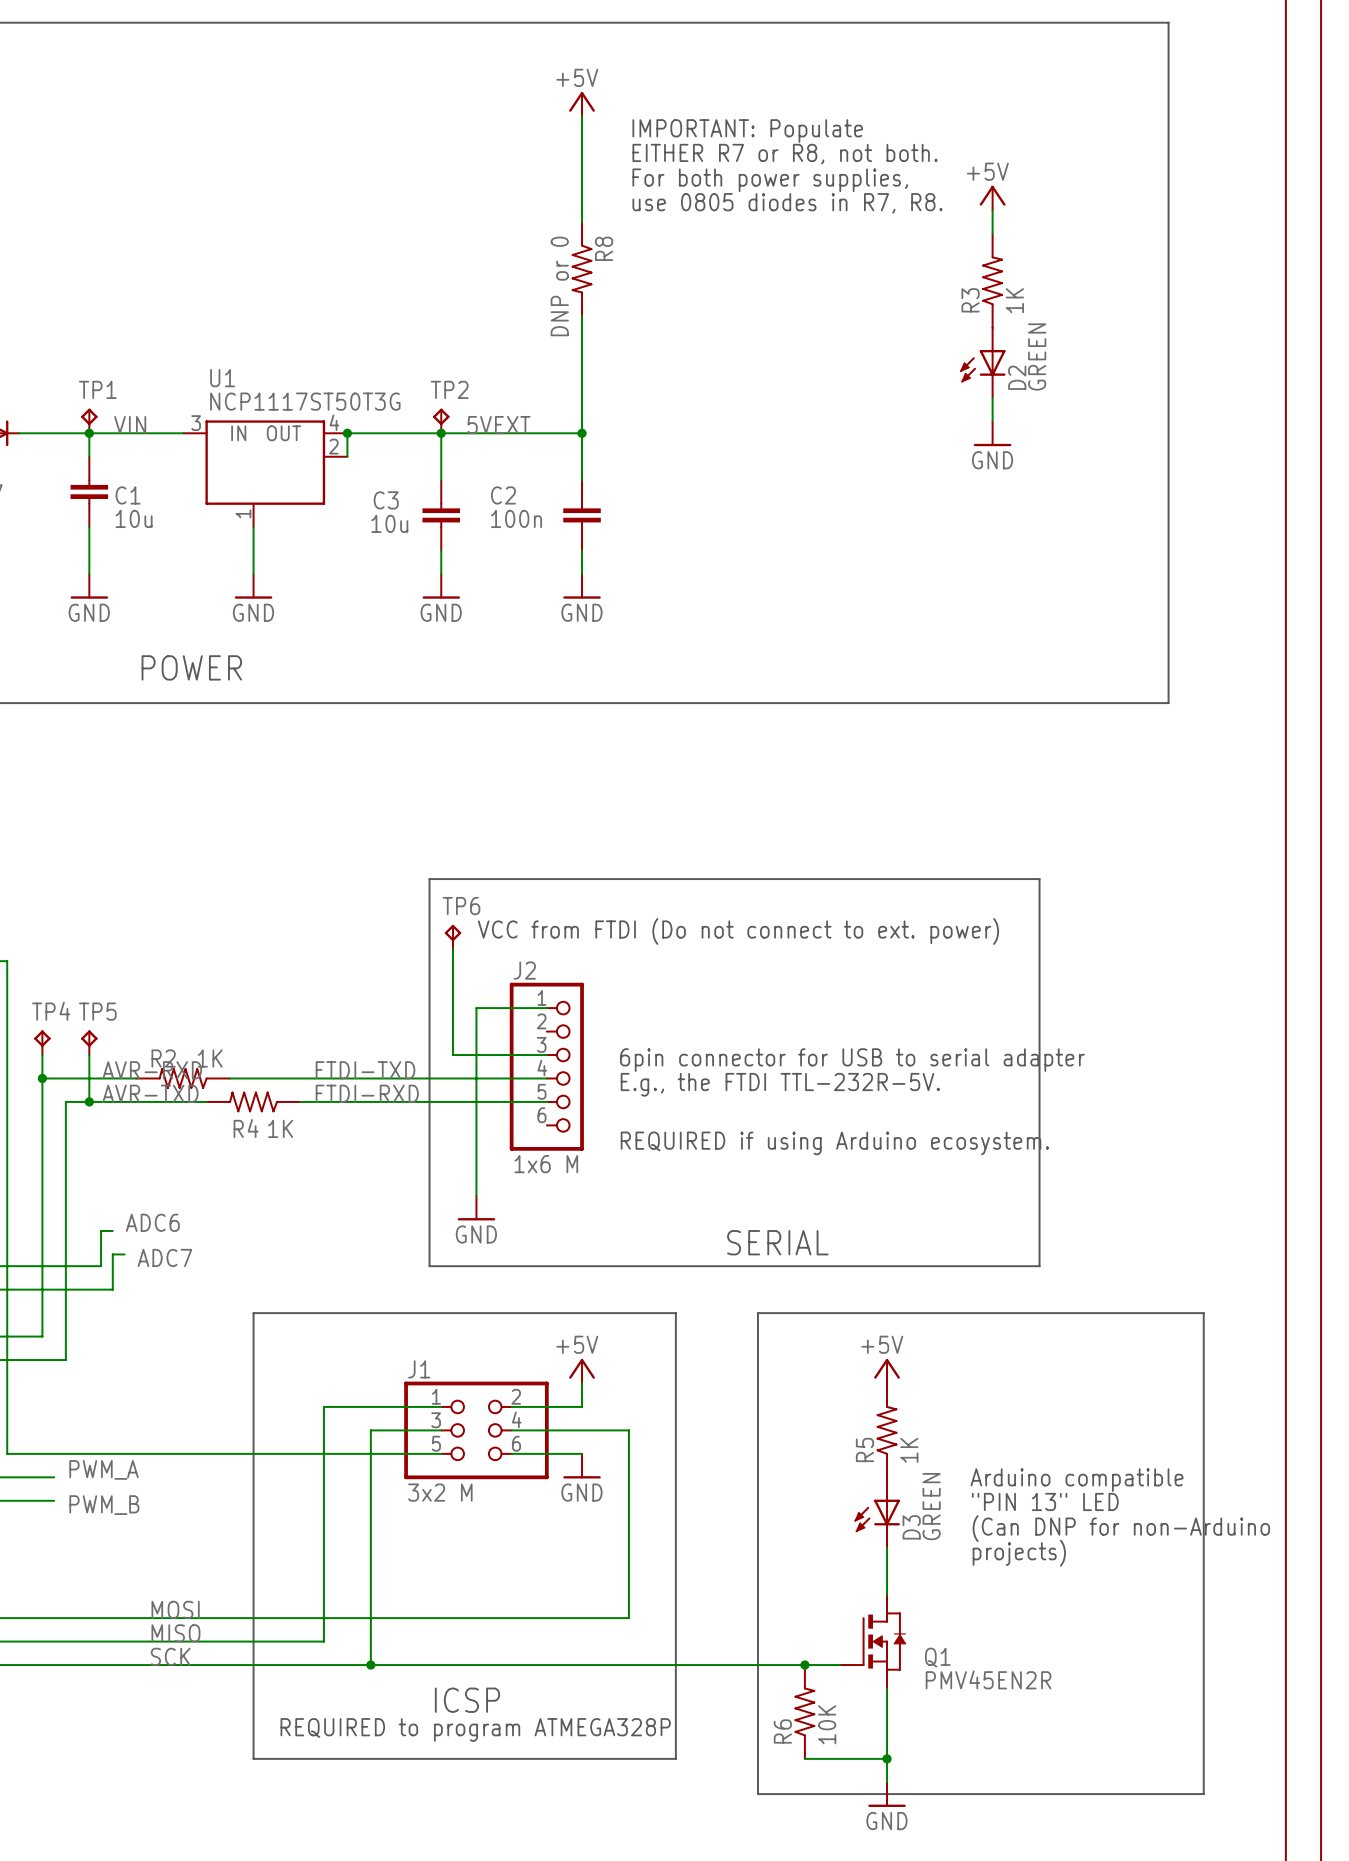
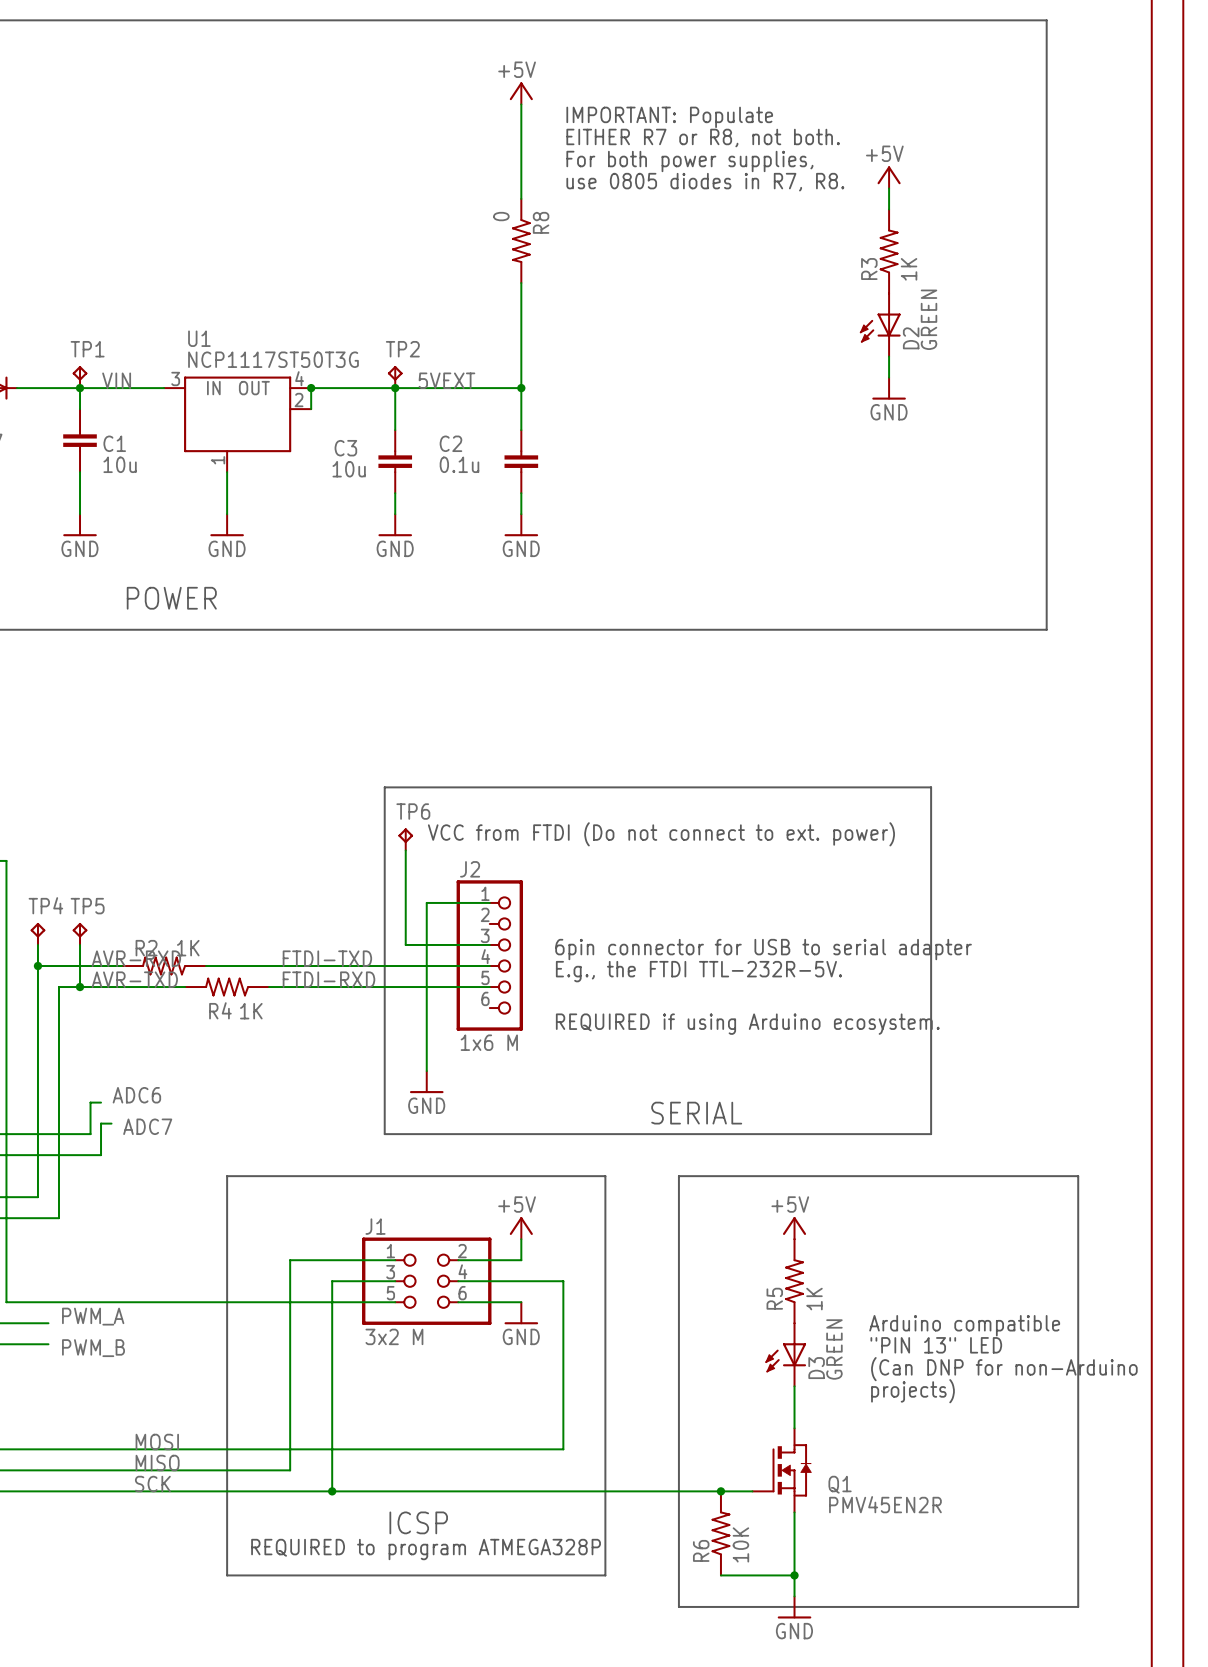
R8 value: DNP or 0 (559, 286) -> 0 (501, 216)
C2 value: 100n (516, 518) -> 0.1u (459, 464)

